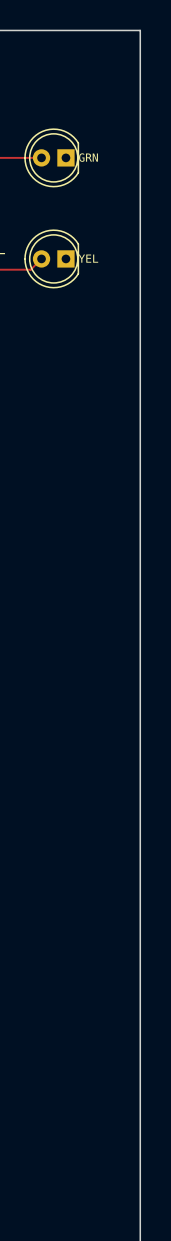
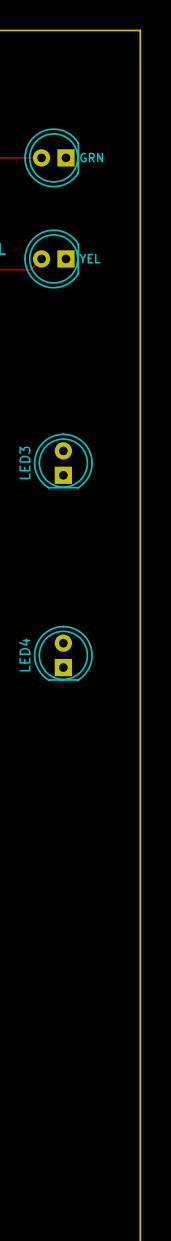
LED3: none -> (63, 461)
LED4: none -> (63, 653)

